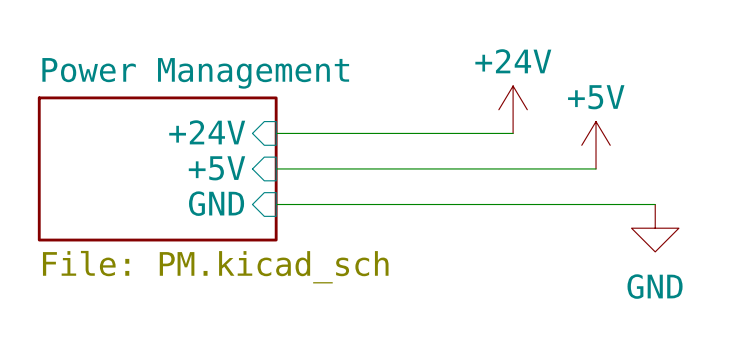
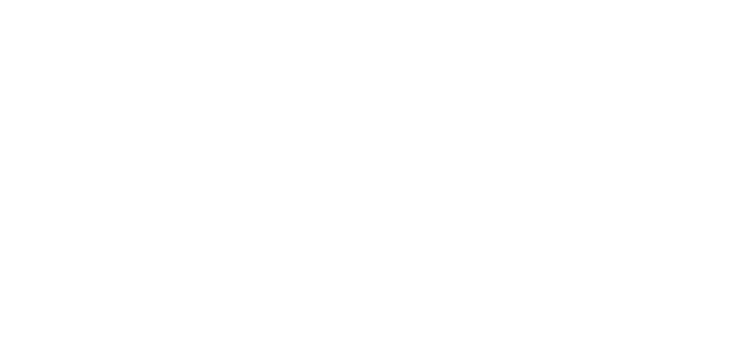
power symbol: +24V (513, 109) -> none
sheet pin: +24V (207, 132) -> none
wire: (276, 133) (513, 133) -> none
power symbol: +5V (596, 145) -> none
sheet Power Management: File: PM.kicad_sch (157, 168) -> none
sheet pin: +5V (216, 168) -> none
wire: (276, 168) (596, 168) -> none
sheet pin: GND (216, 203) -> none
wire: (276, 204) (655, 204) -> none
power symbol: GND (655, 228) -> none

